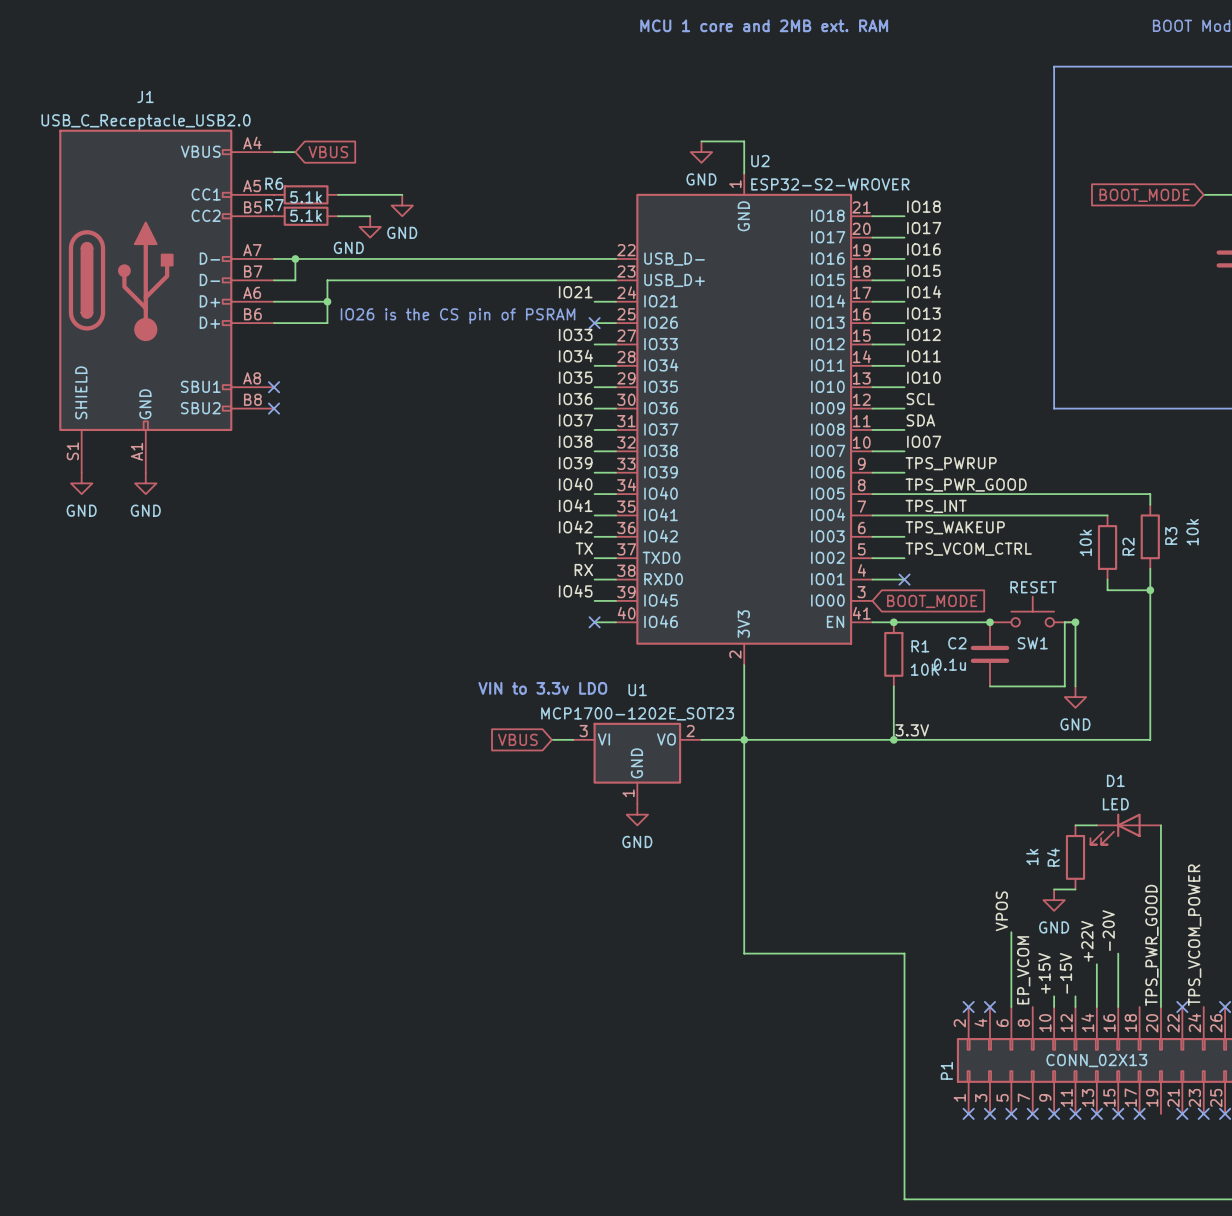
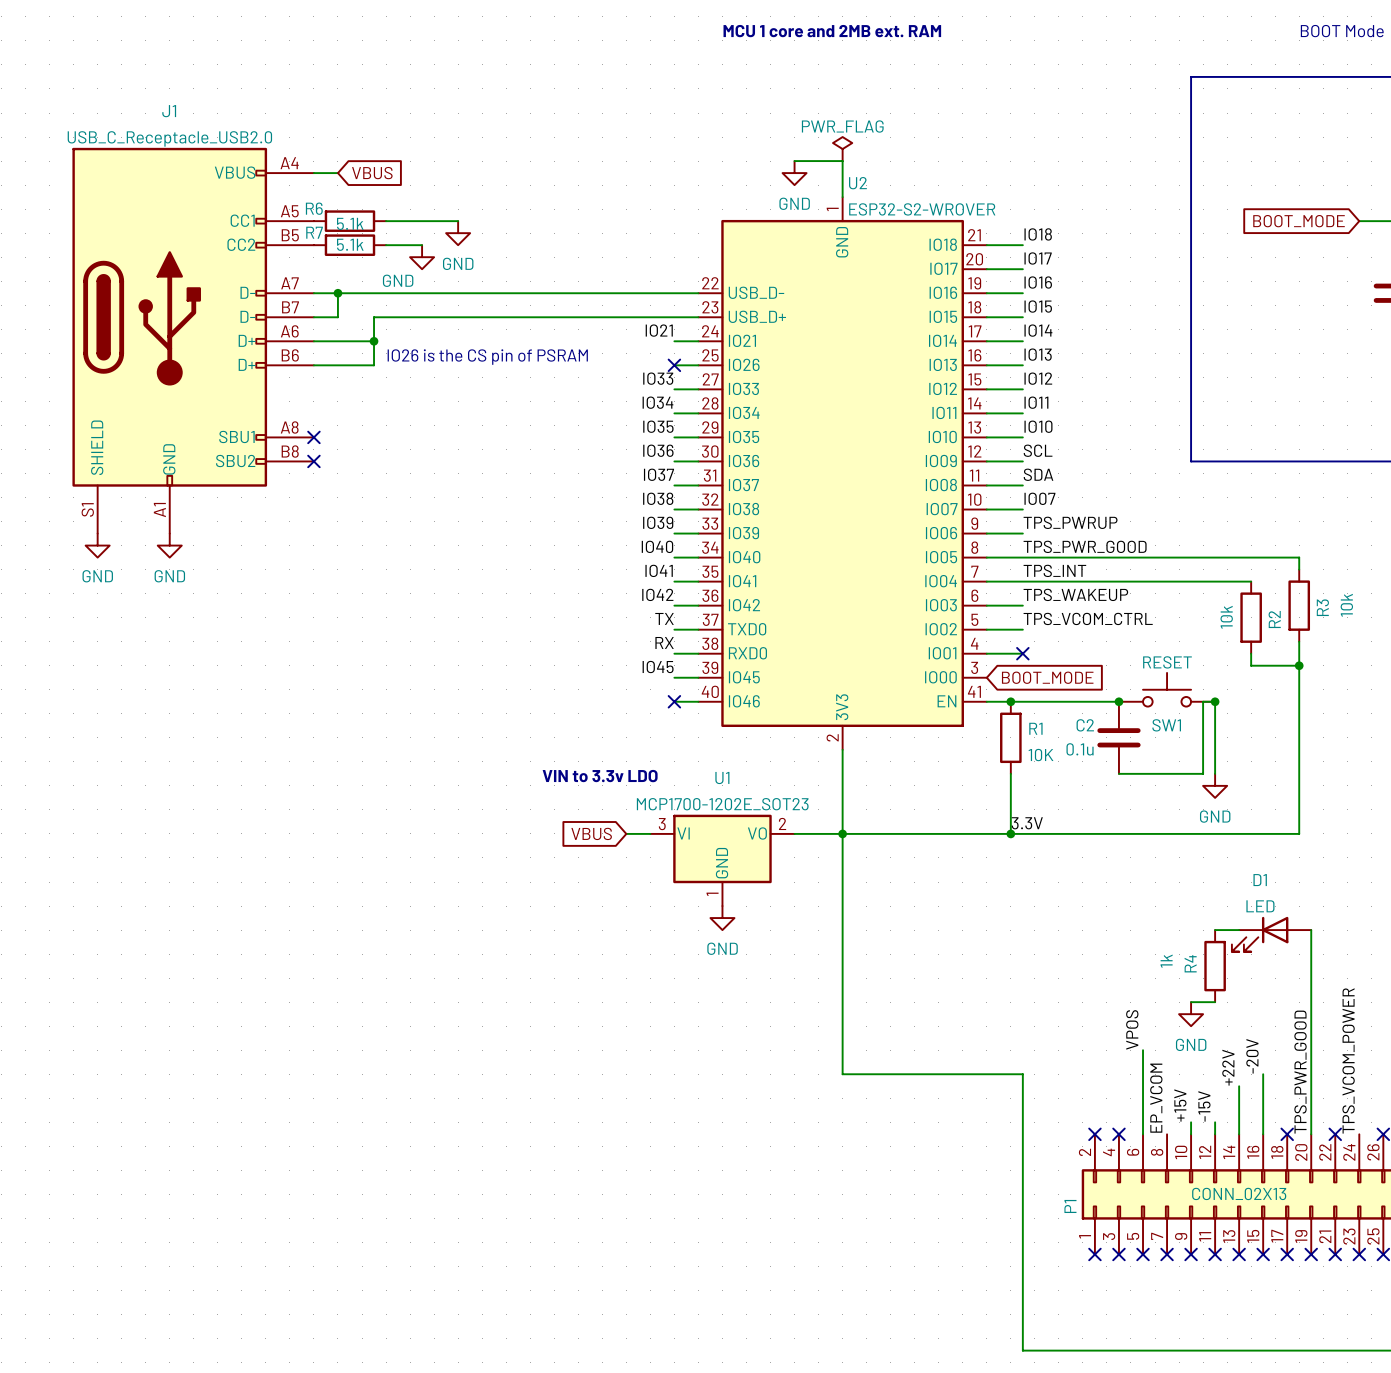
power symbol: none -> PWR_FLAG (842, 149)
no-connect mark: none -> (1287, 1134)
no-connect mark: none -> (1311, 1254)

